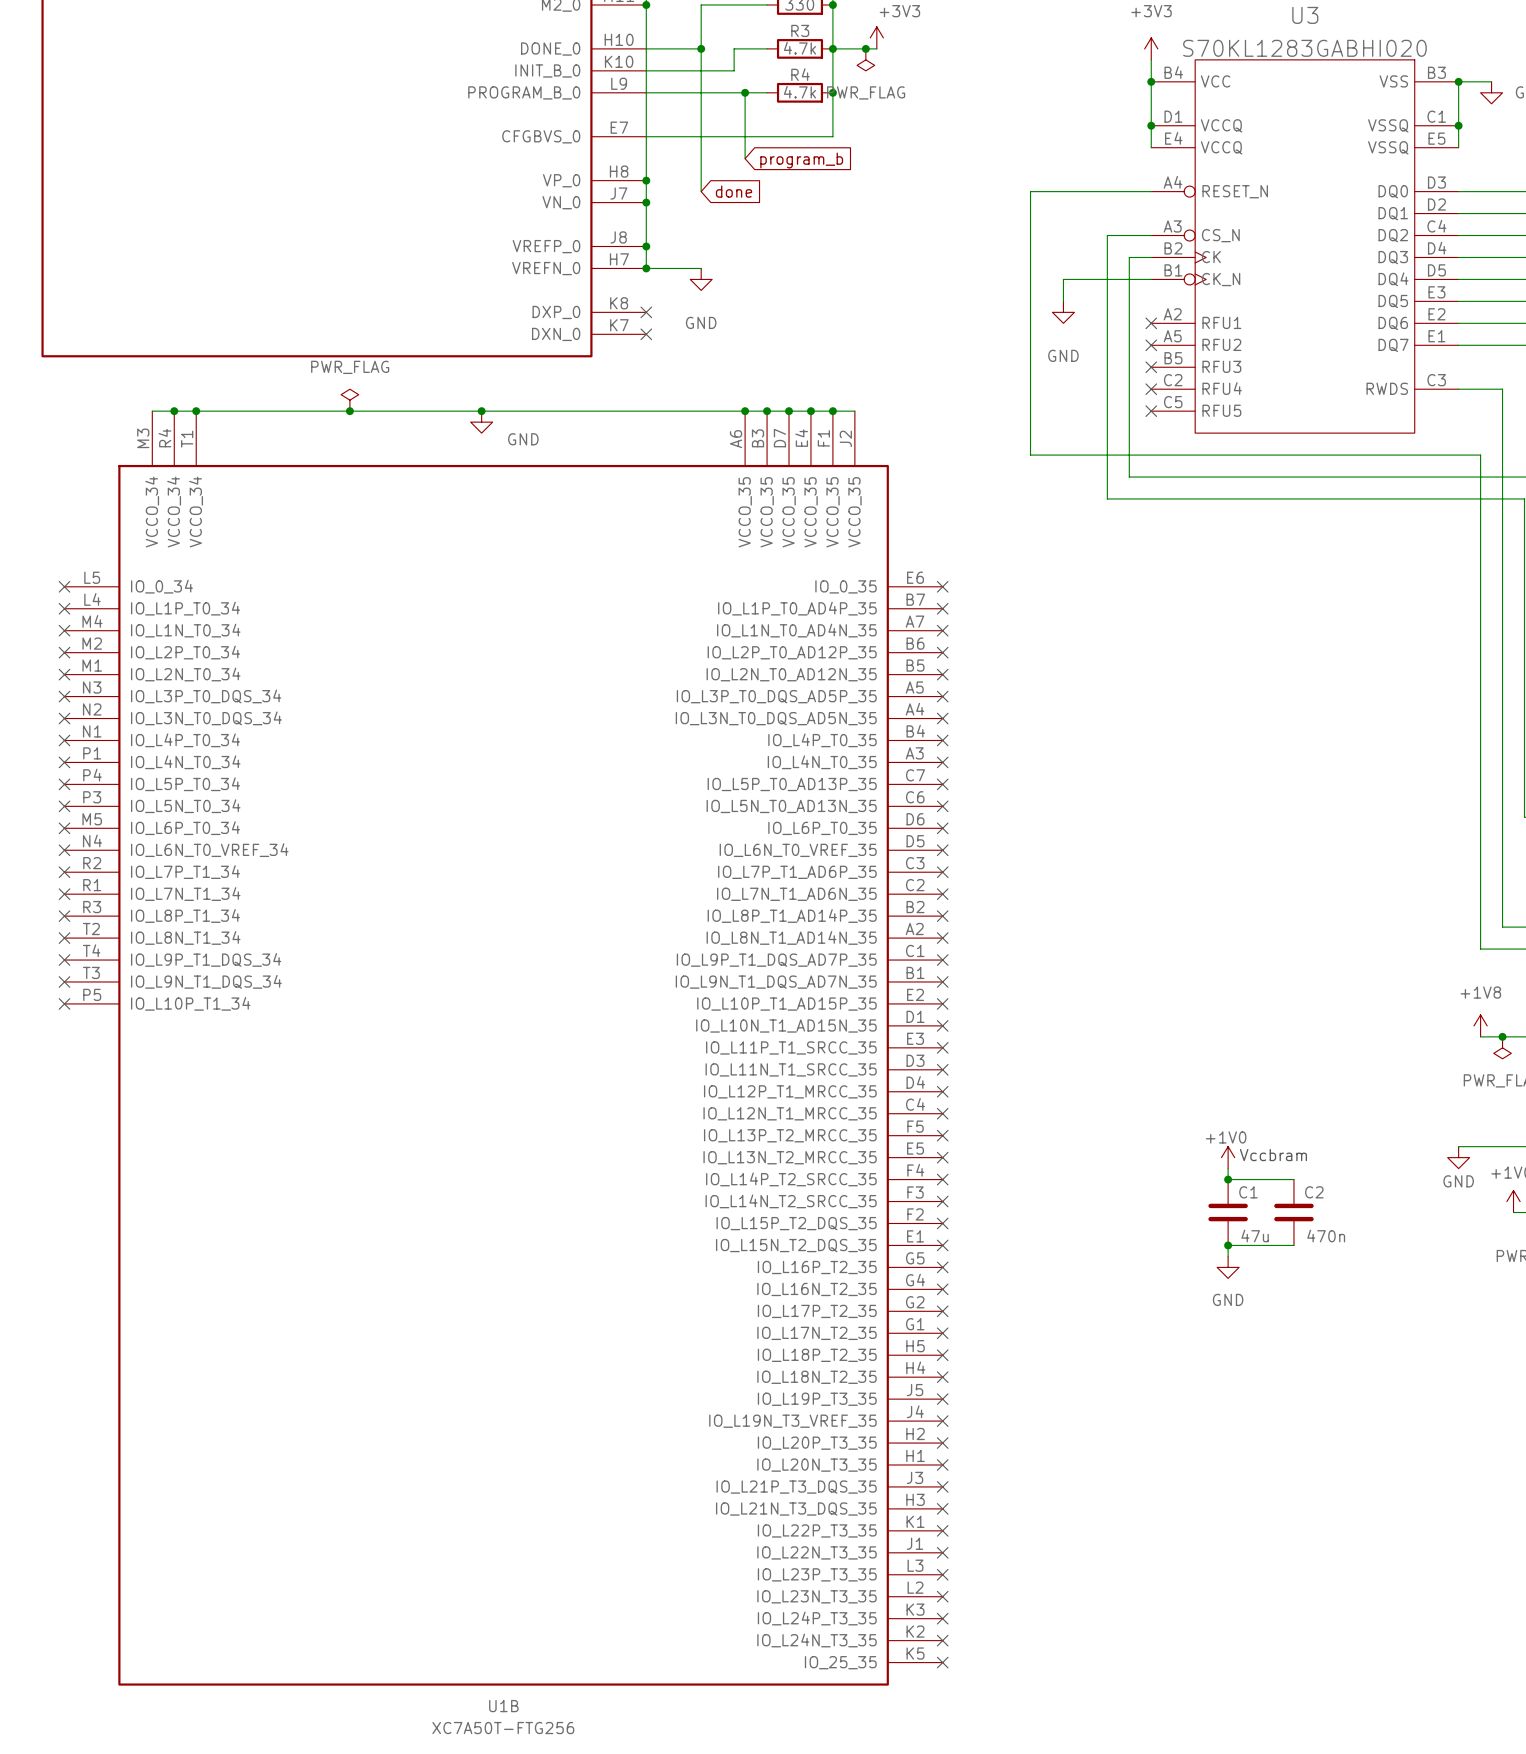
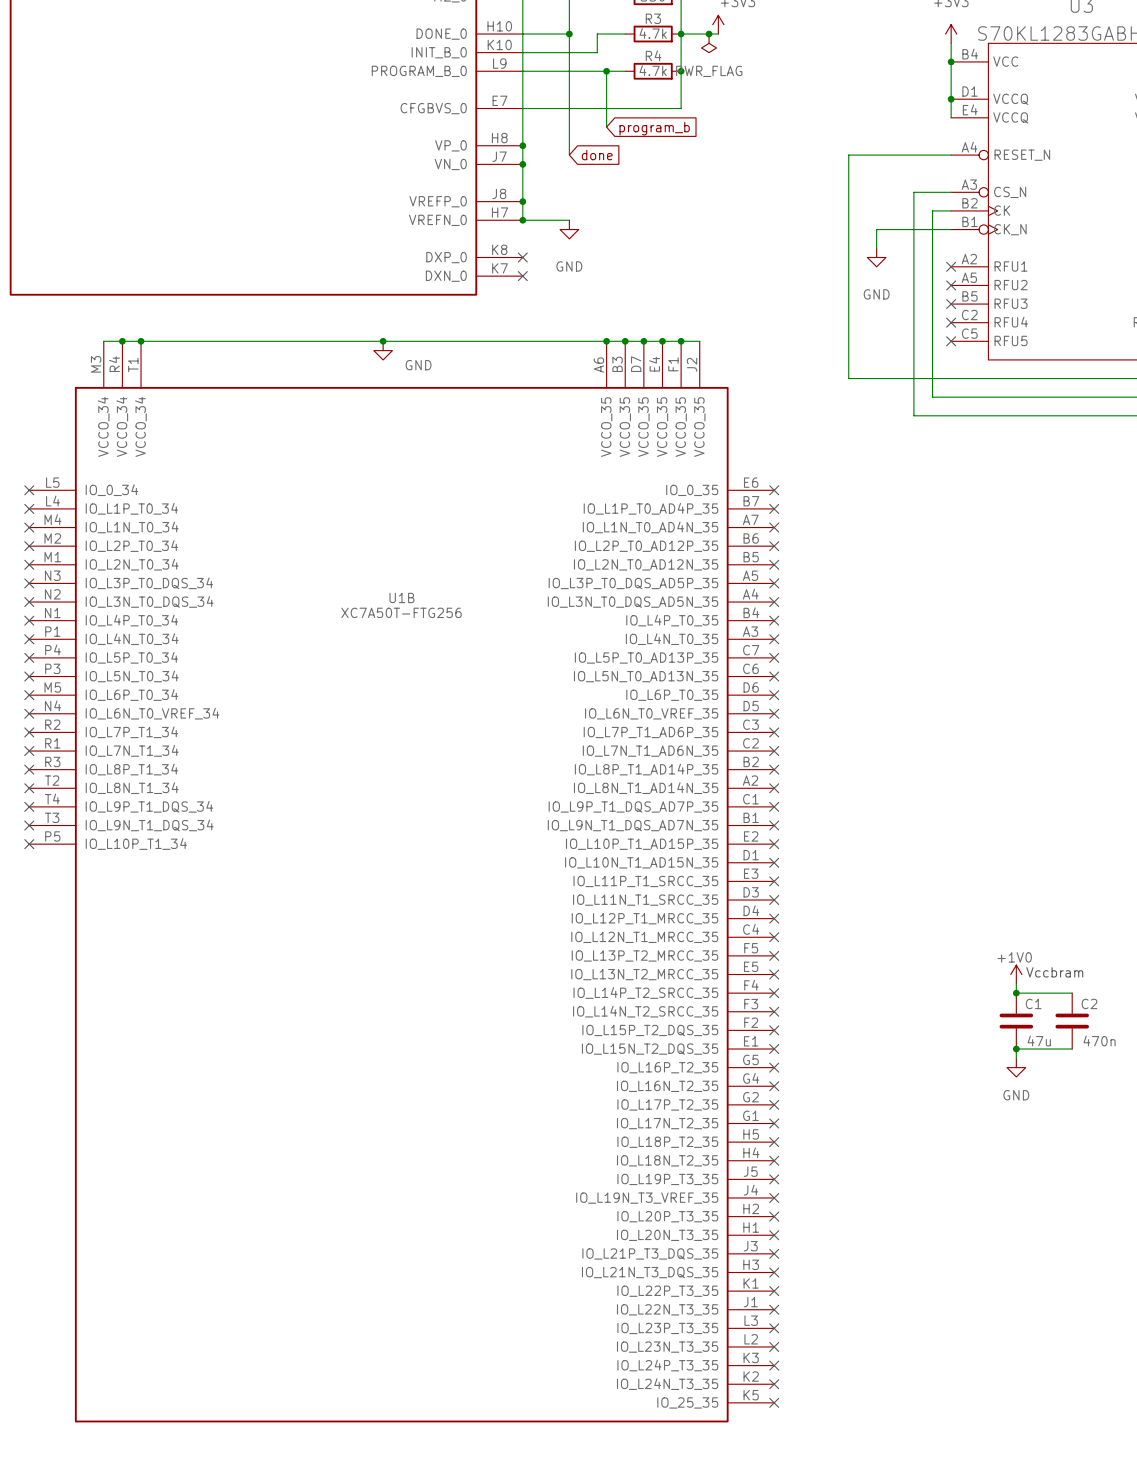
power symbol: PWR_FLAG (349, 400) -> none
junction: (349, 411) -> none
U1B name position: U1B (503, 1706) -> U1B (401, 597)
U1B value position: XC7A50T-FTG256 (503, 1728) -> XC7A50T-FTG256 (401, 612)

